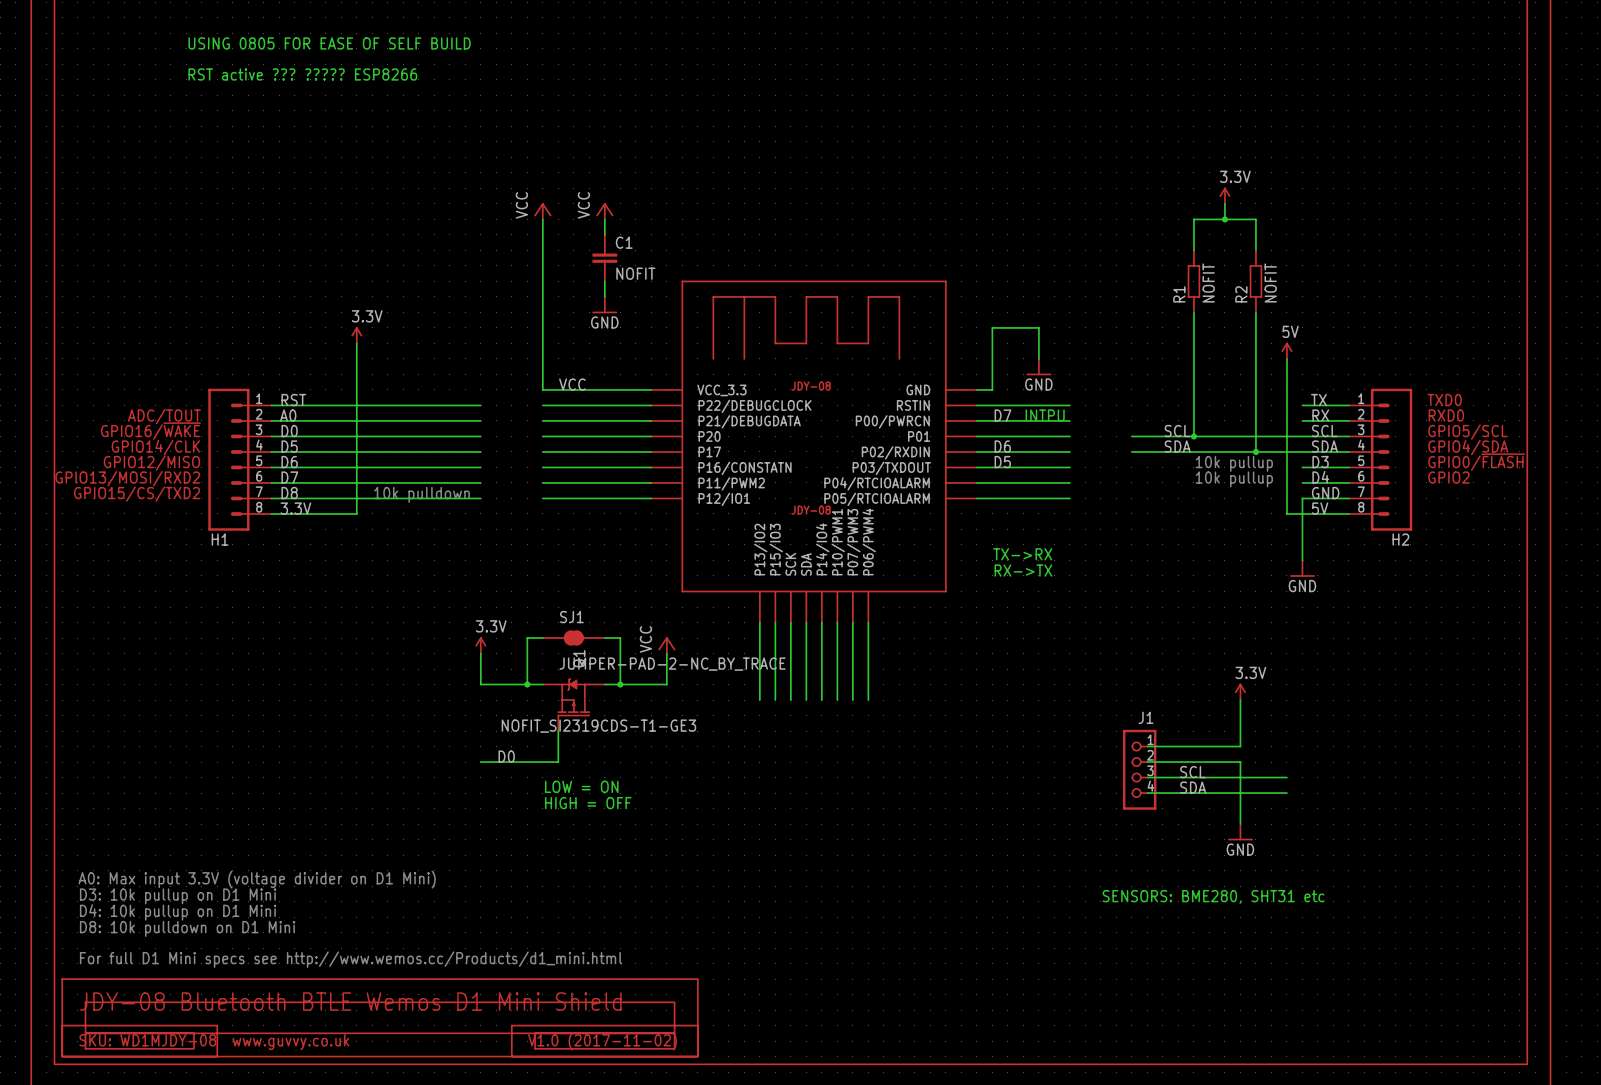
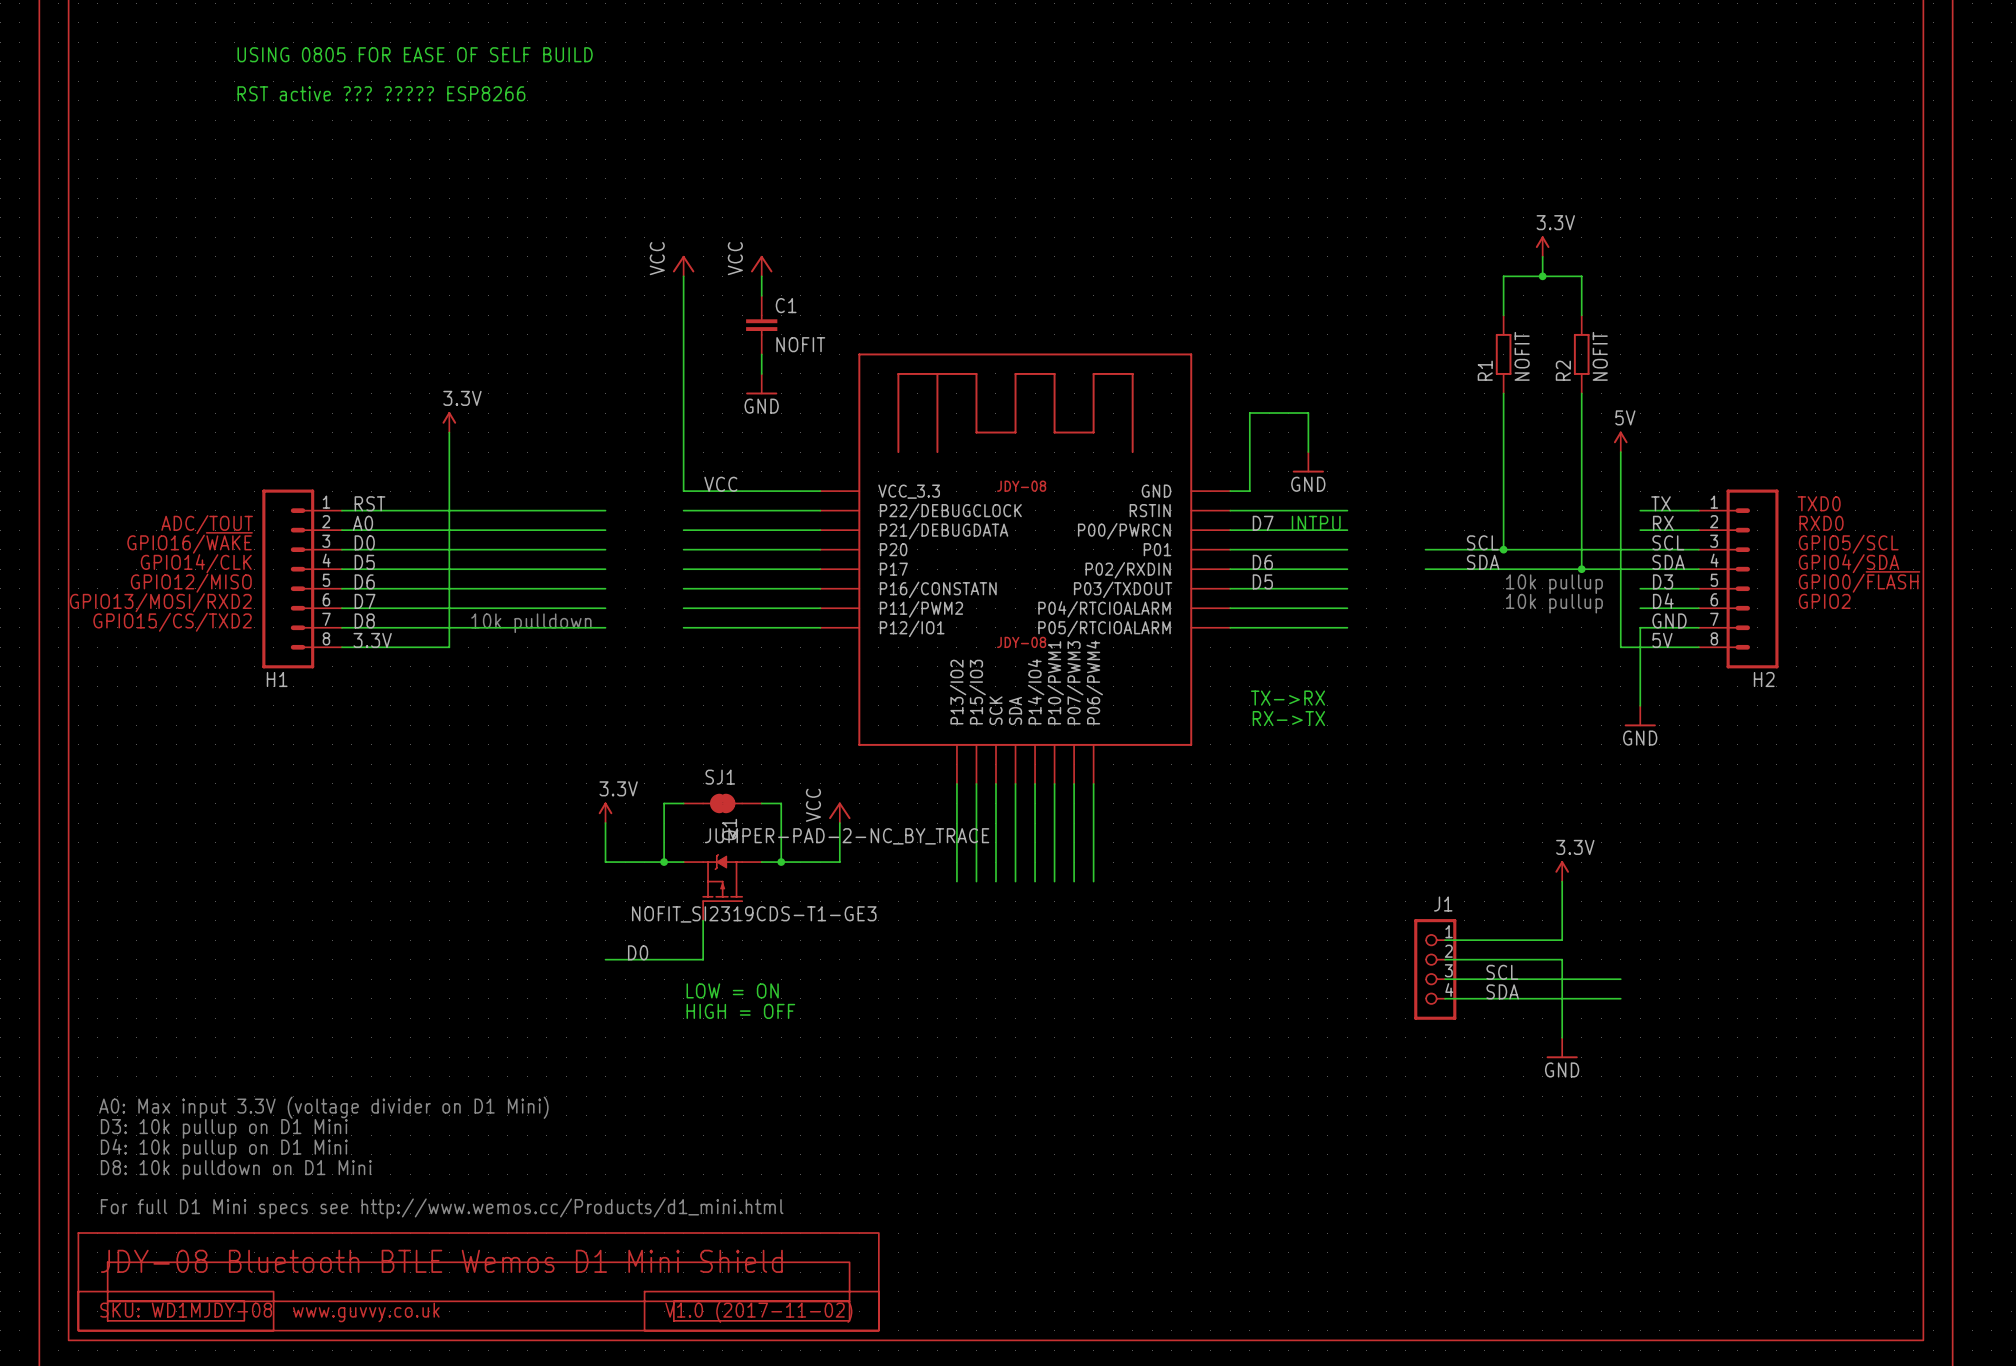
text: SENSORS: BME280, SHT31 etc (1213, 896) -> none

